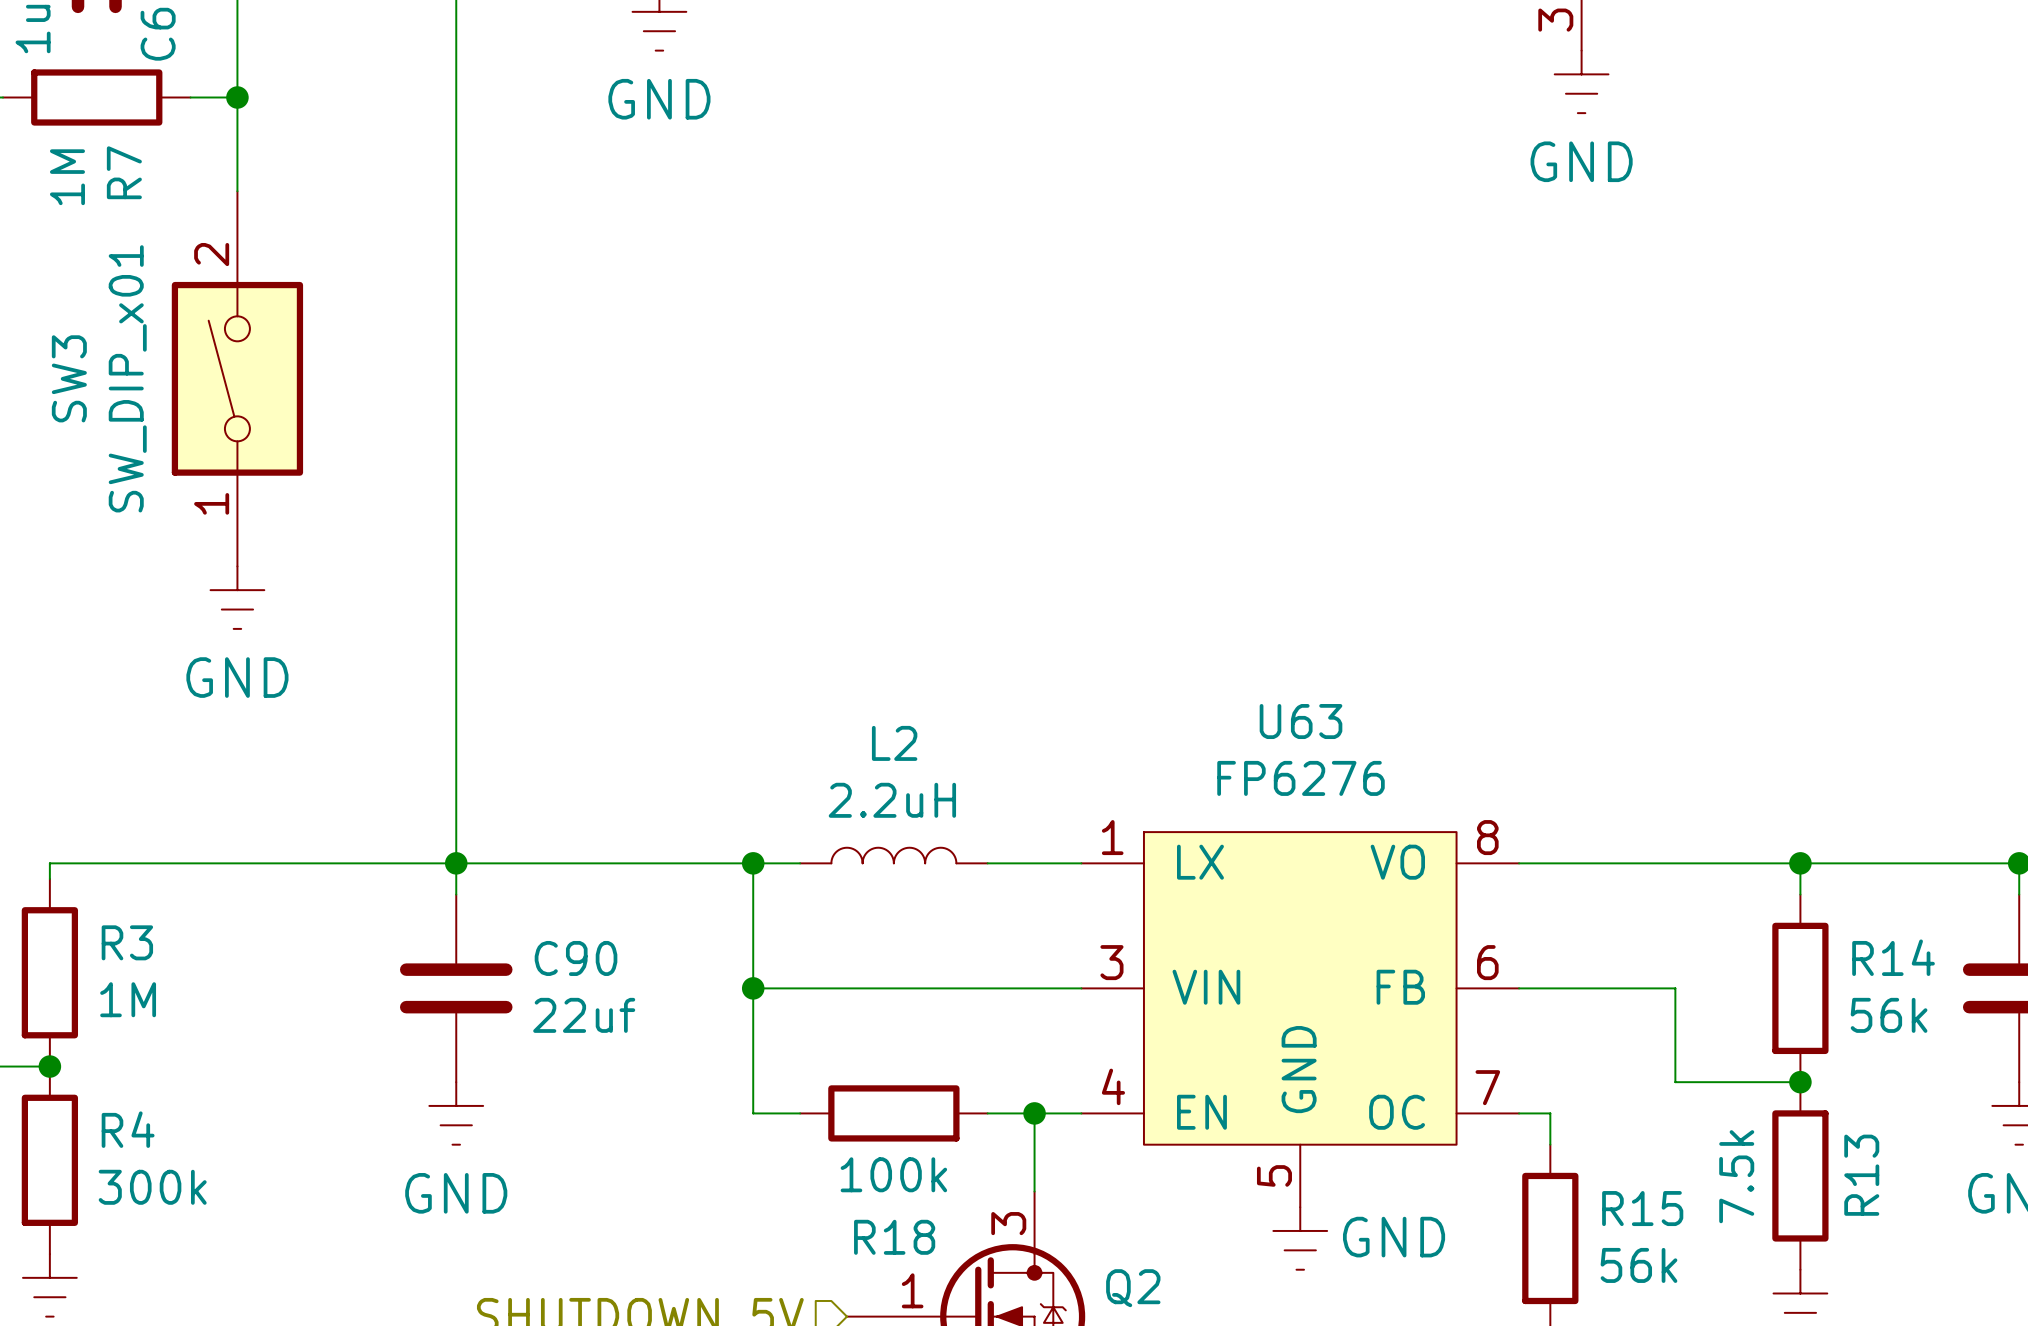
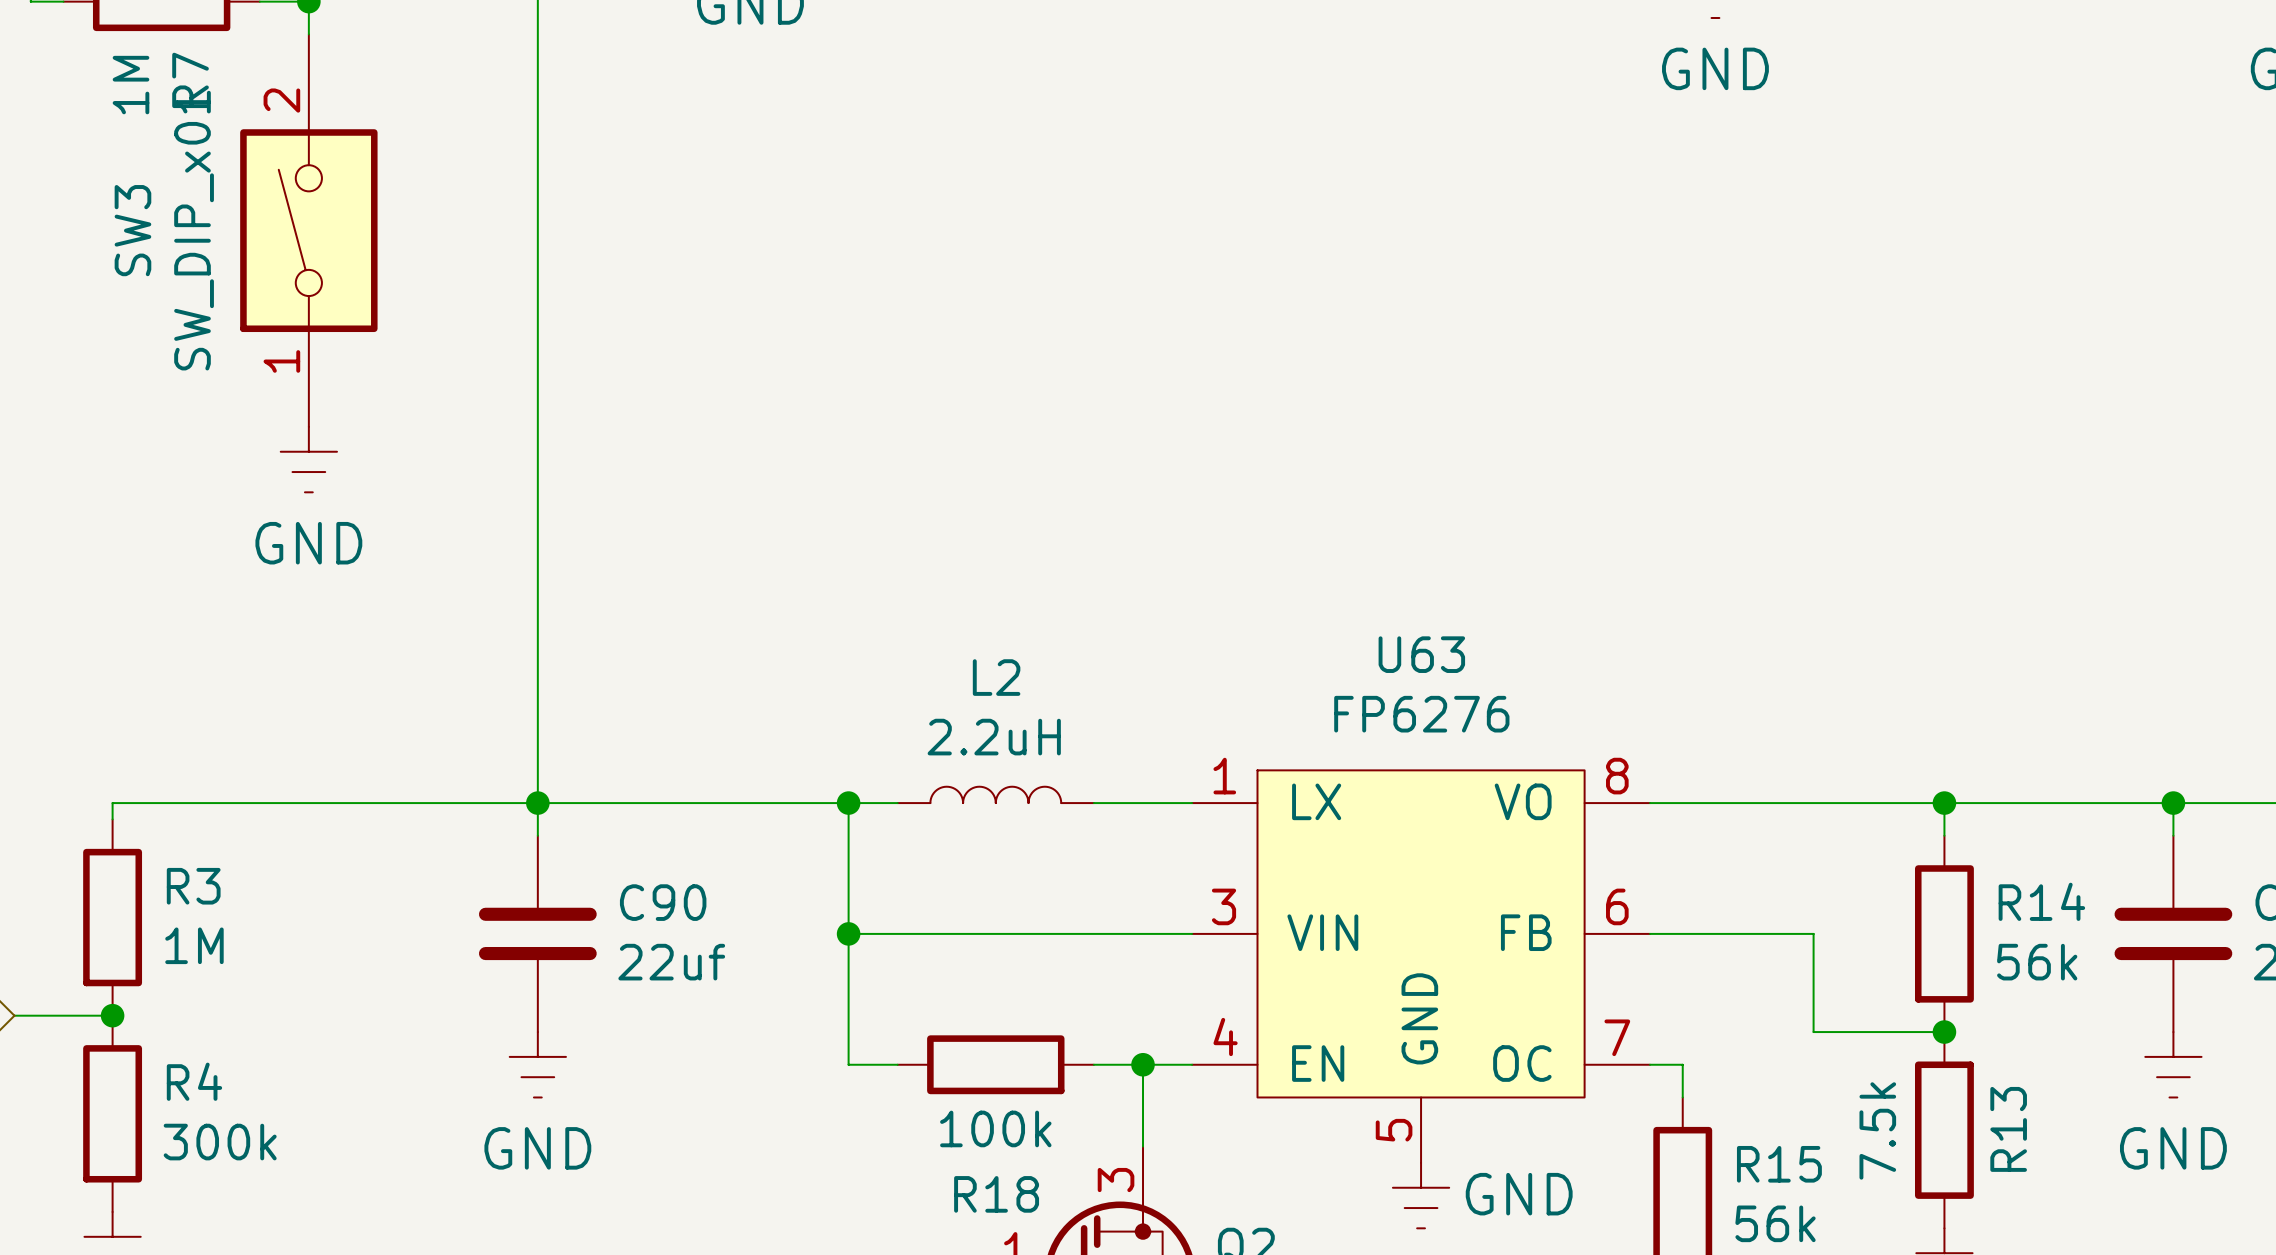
SW3 position: (237, 378) -> (308, 230)
power symbol position: GND (237, 597) -> GND (308, 459)

